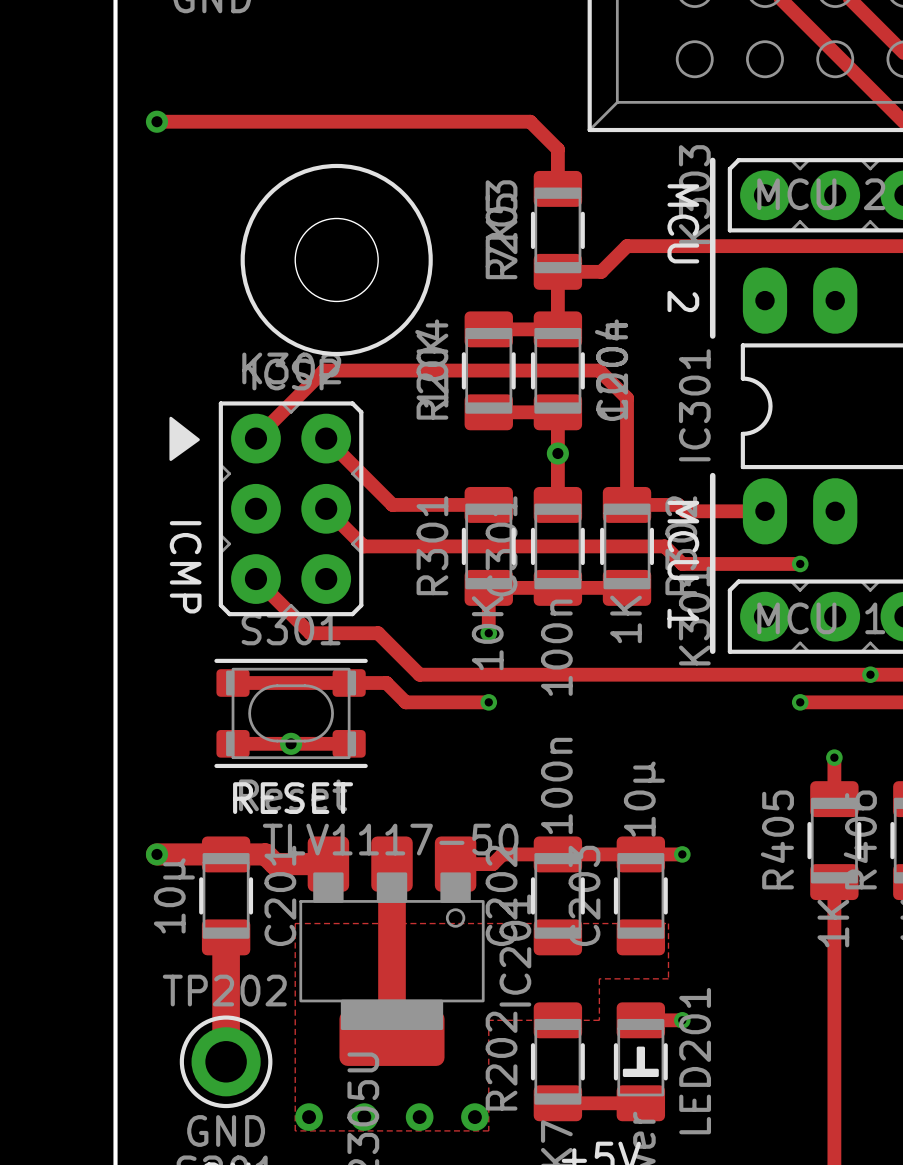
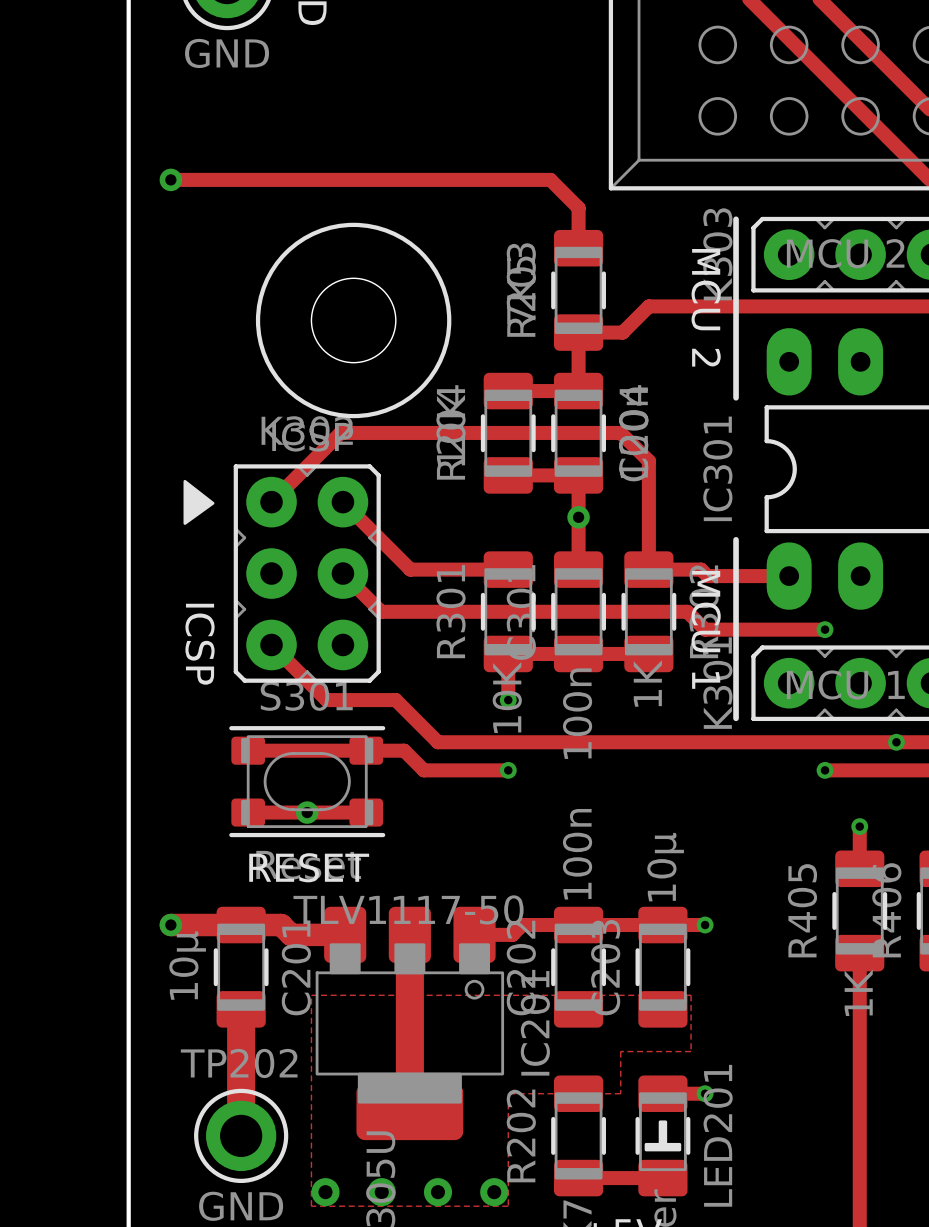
text: ICMP (185, 567) -> ICSP (200, 644)

